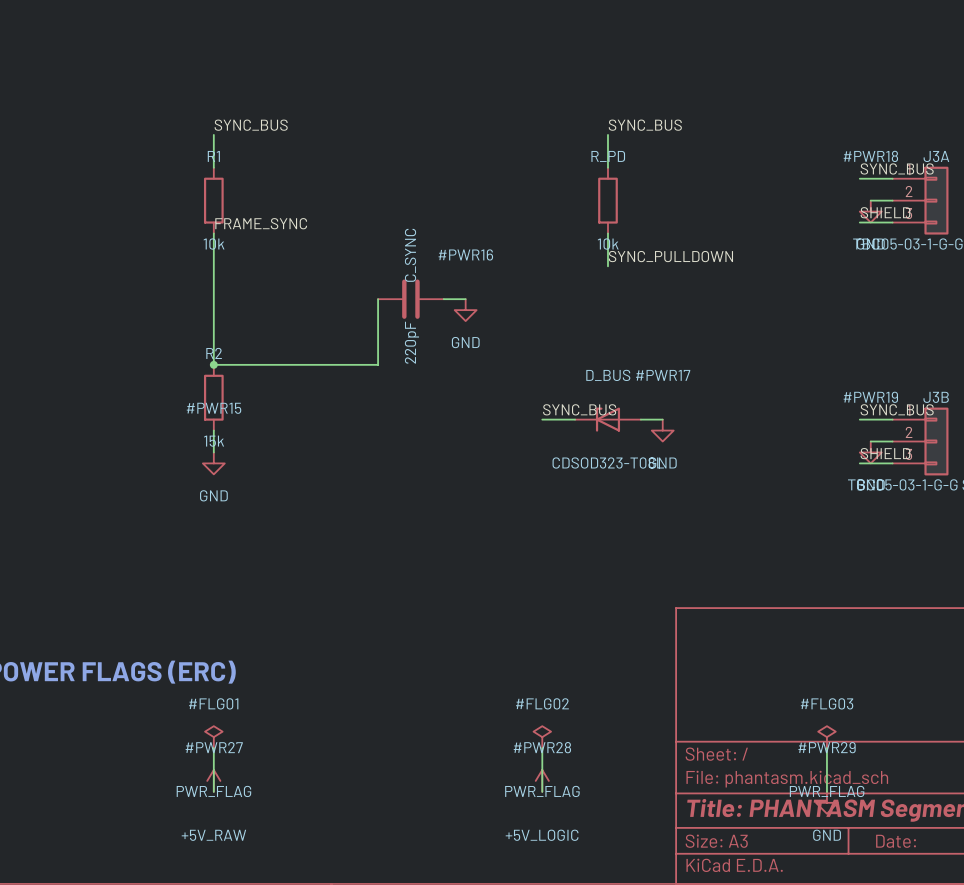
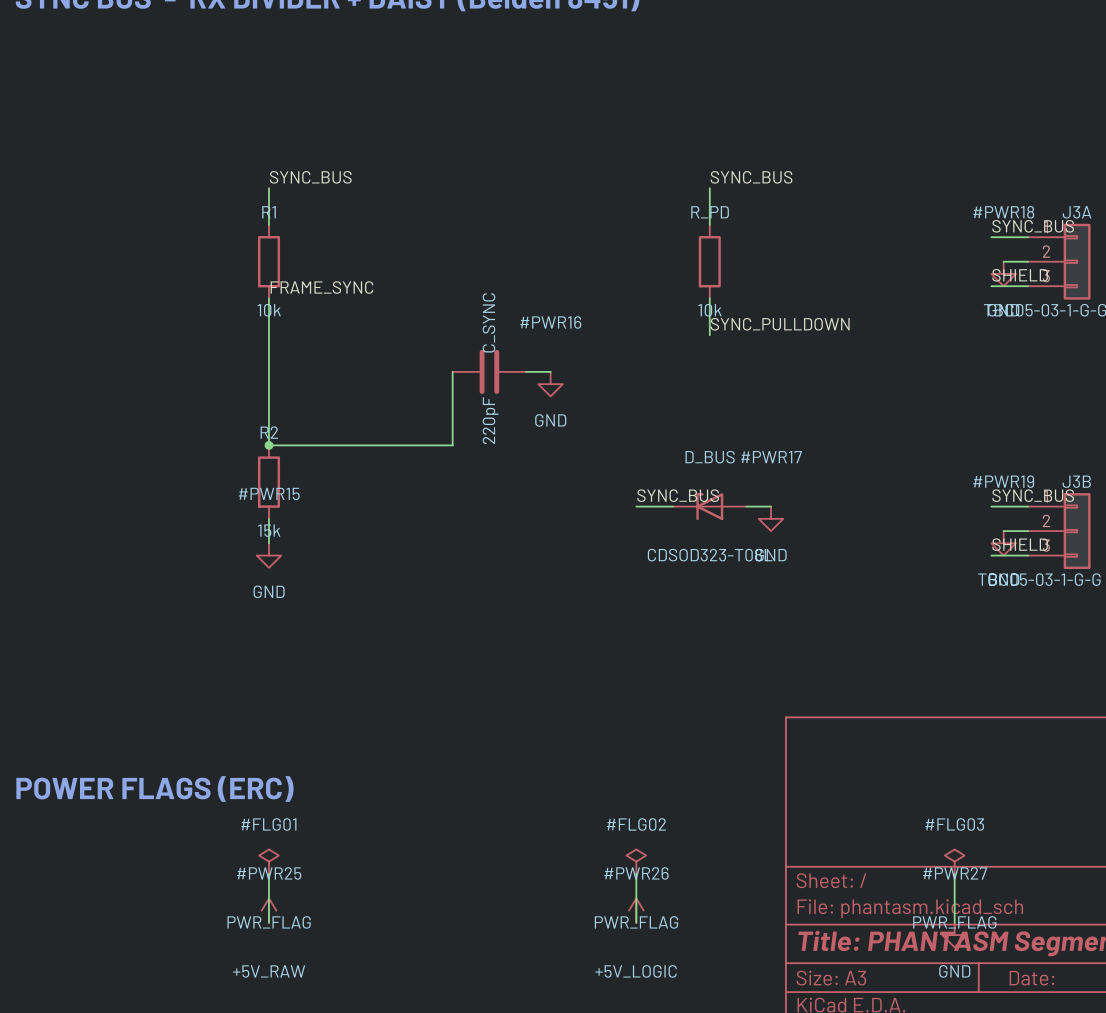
#PWR27 name: #PWR27 (214, 747) -> #PWR25 (269, 873)
#PWR28 name: #PWR28 (542, 747) -> #PWR26 (636, 873)
#PWR29 name: #PWR29 (827, 747) -> #PWR27 (955, 873)

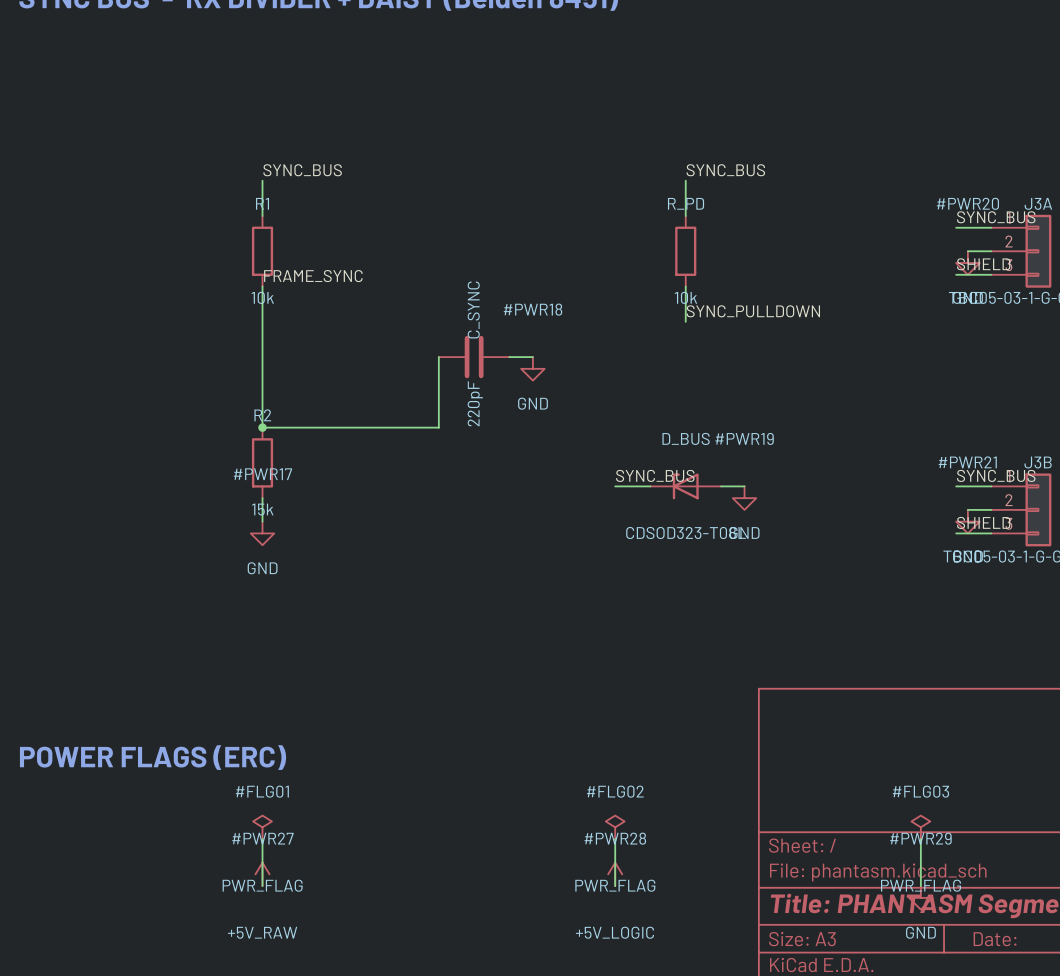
#PWR18 name: #PWR18 (1003, 212) -> #PWR20 (967, 203)
#PWR16 name: #PWR16 (550, 322) -> #PWR18 (533, 309)
#PWR17 name: #PWR17 (771, 457) -> #PWR19 (744, 438)
#PWR19 name: #PWR19 (1003, 481) -> #PWR21 (967, 462)
#PWR15 name: #PWR15 (269, 493) -> #PWR17 (262, 474)
#PWR25 name: #PWR25 (269, 873) -> #PWR27 (262, 838)
#PWR26 name: #PWR26 (636, 873) -> #PWR28 (615, 838)
#PWR27 name: #PWR27 (955, 873) -> #PWR29 (920, 838)

